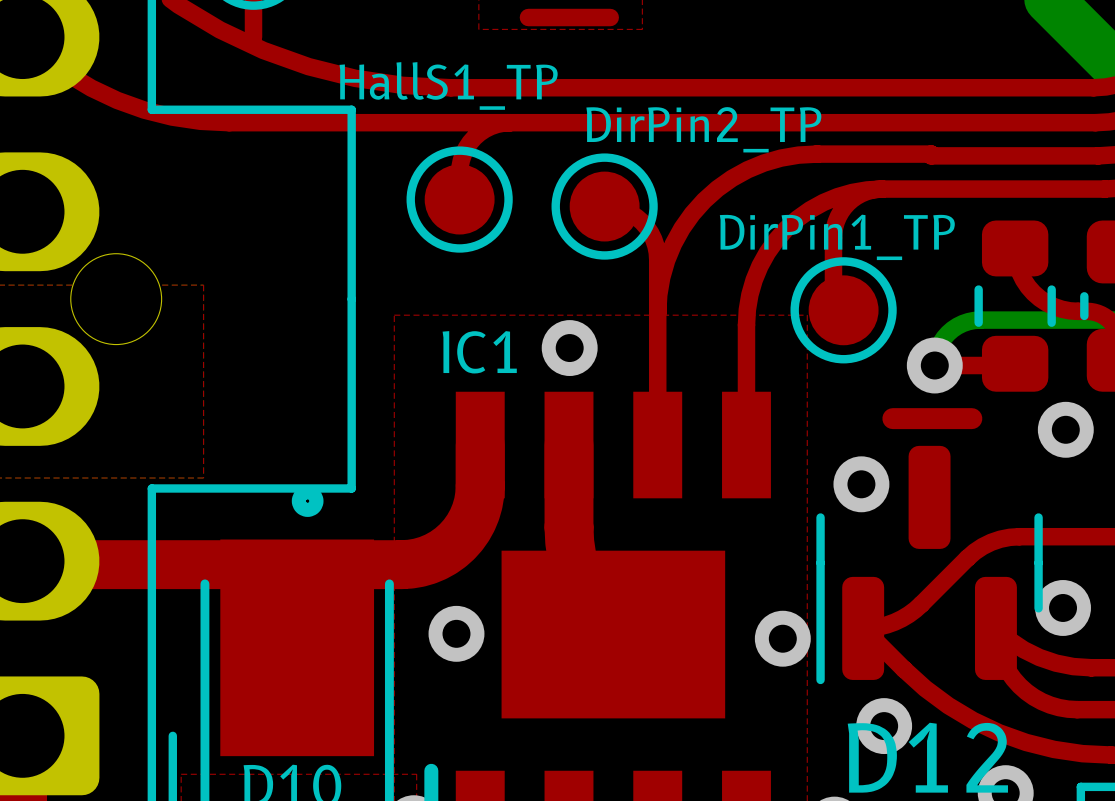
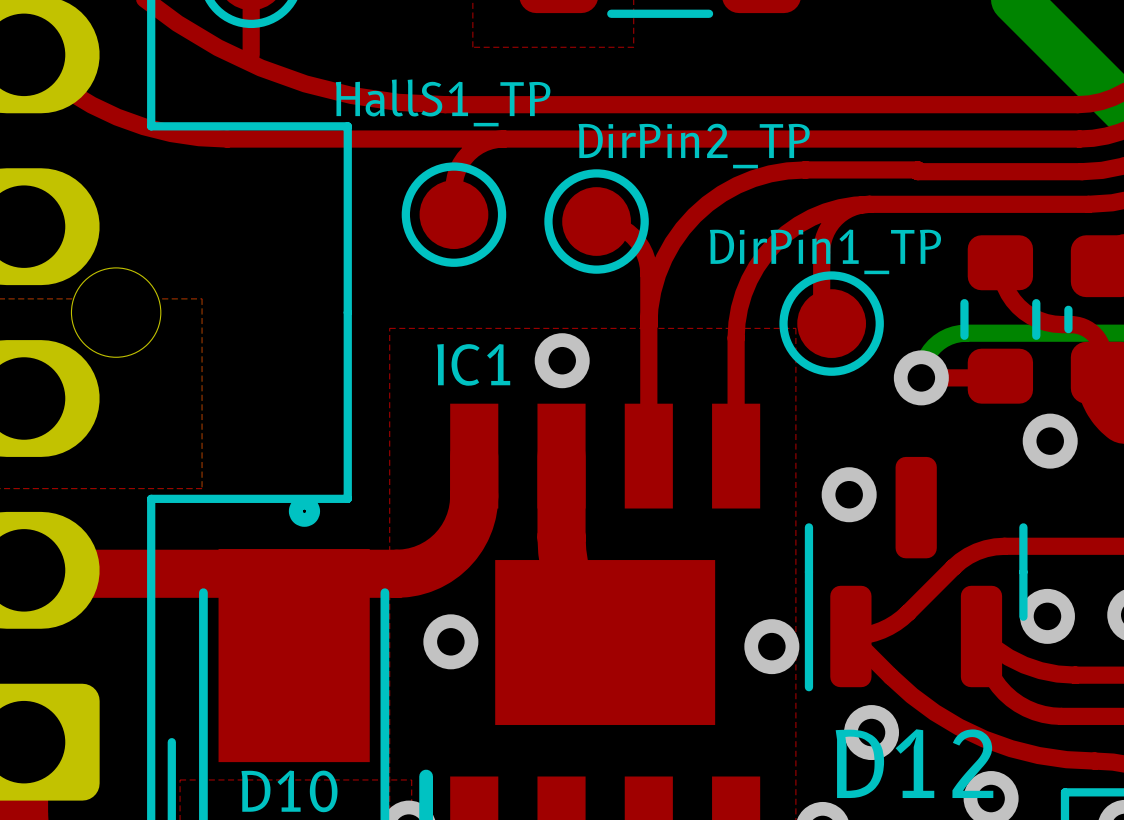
top track: (528, 17) (610, 17) -> none
top track: (892, 418) (971, 418) -> none

